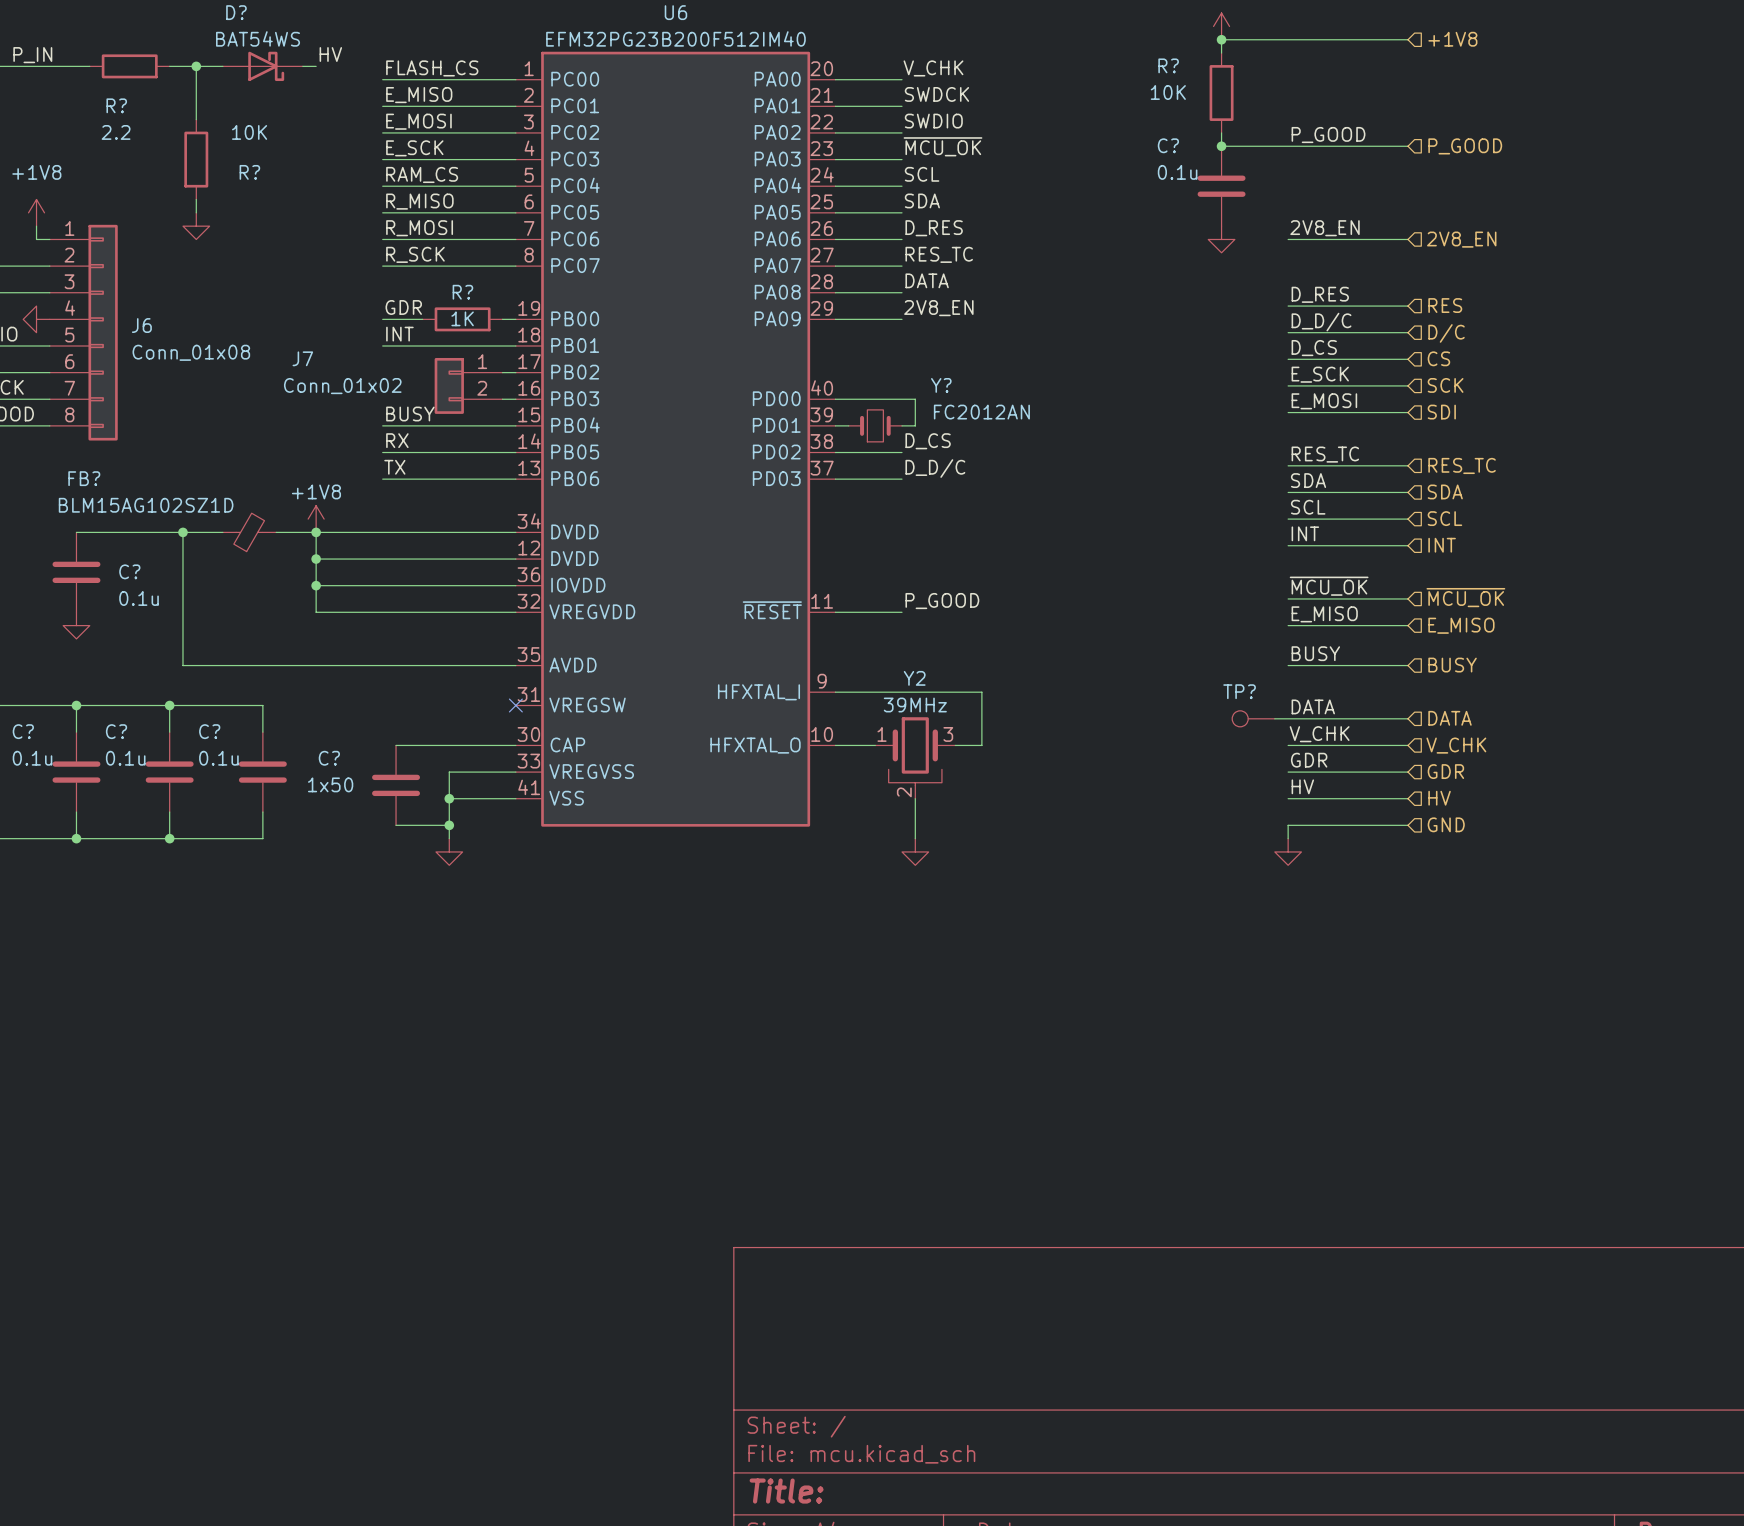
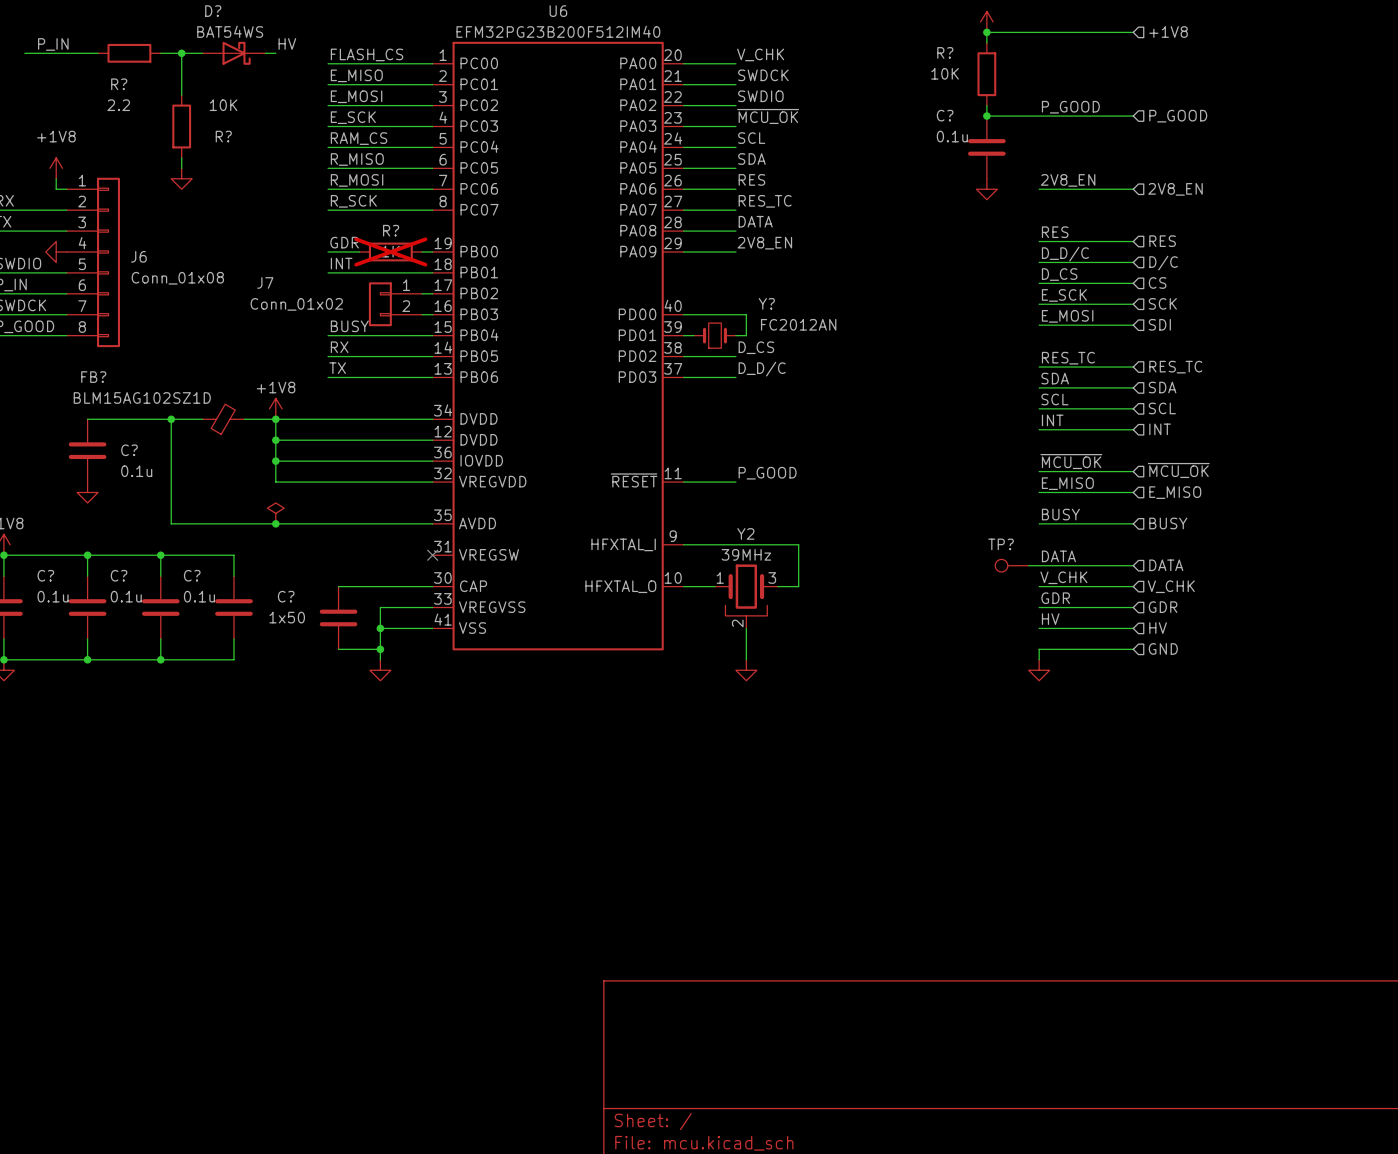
label: D_RES (934, 228) -> RES (751, 179)
label: D_RES (1320, 294) -> RES (1055, 232)
R? do-not-place cross: none -> (390, 251)
power symbol: none -> (275, 513)
junction: none -> (275, 523)

